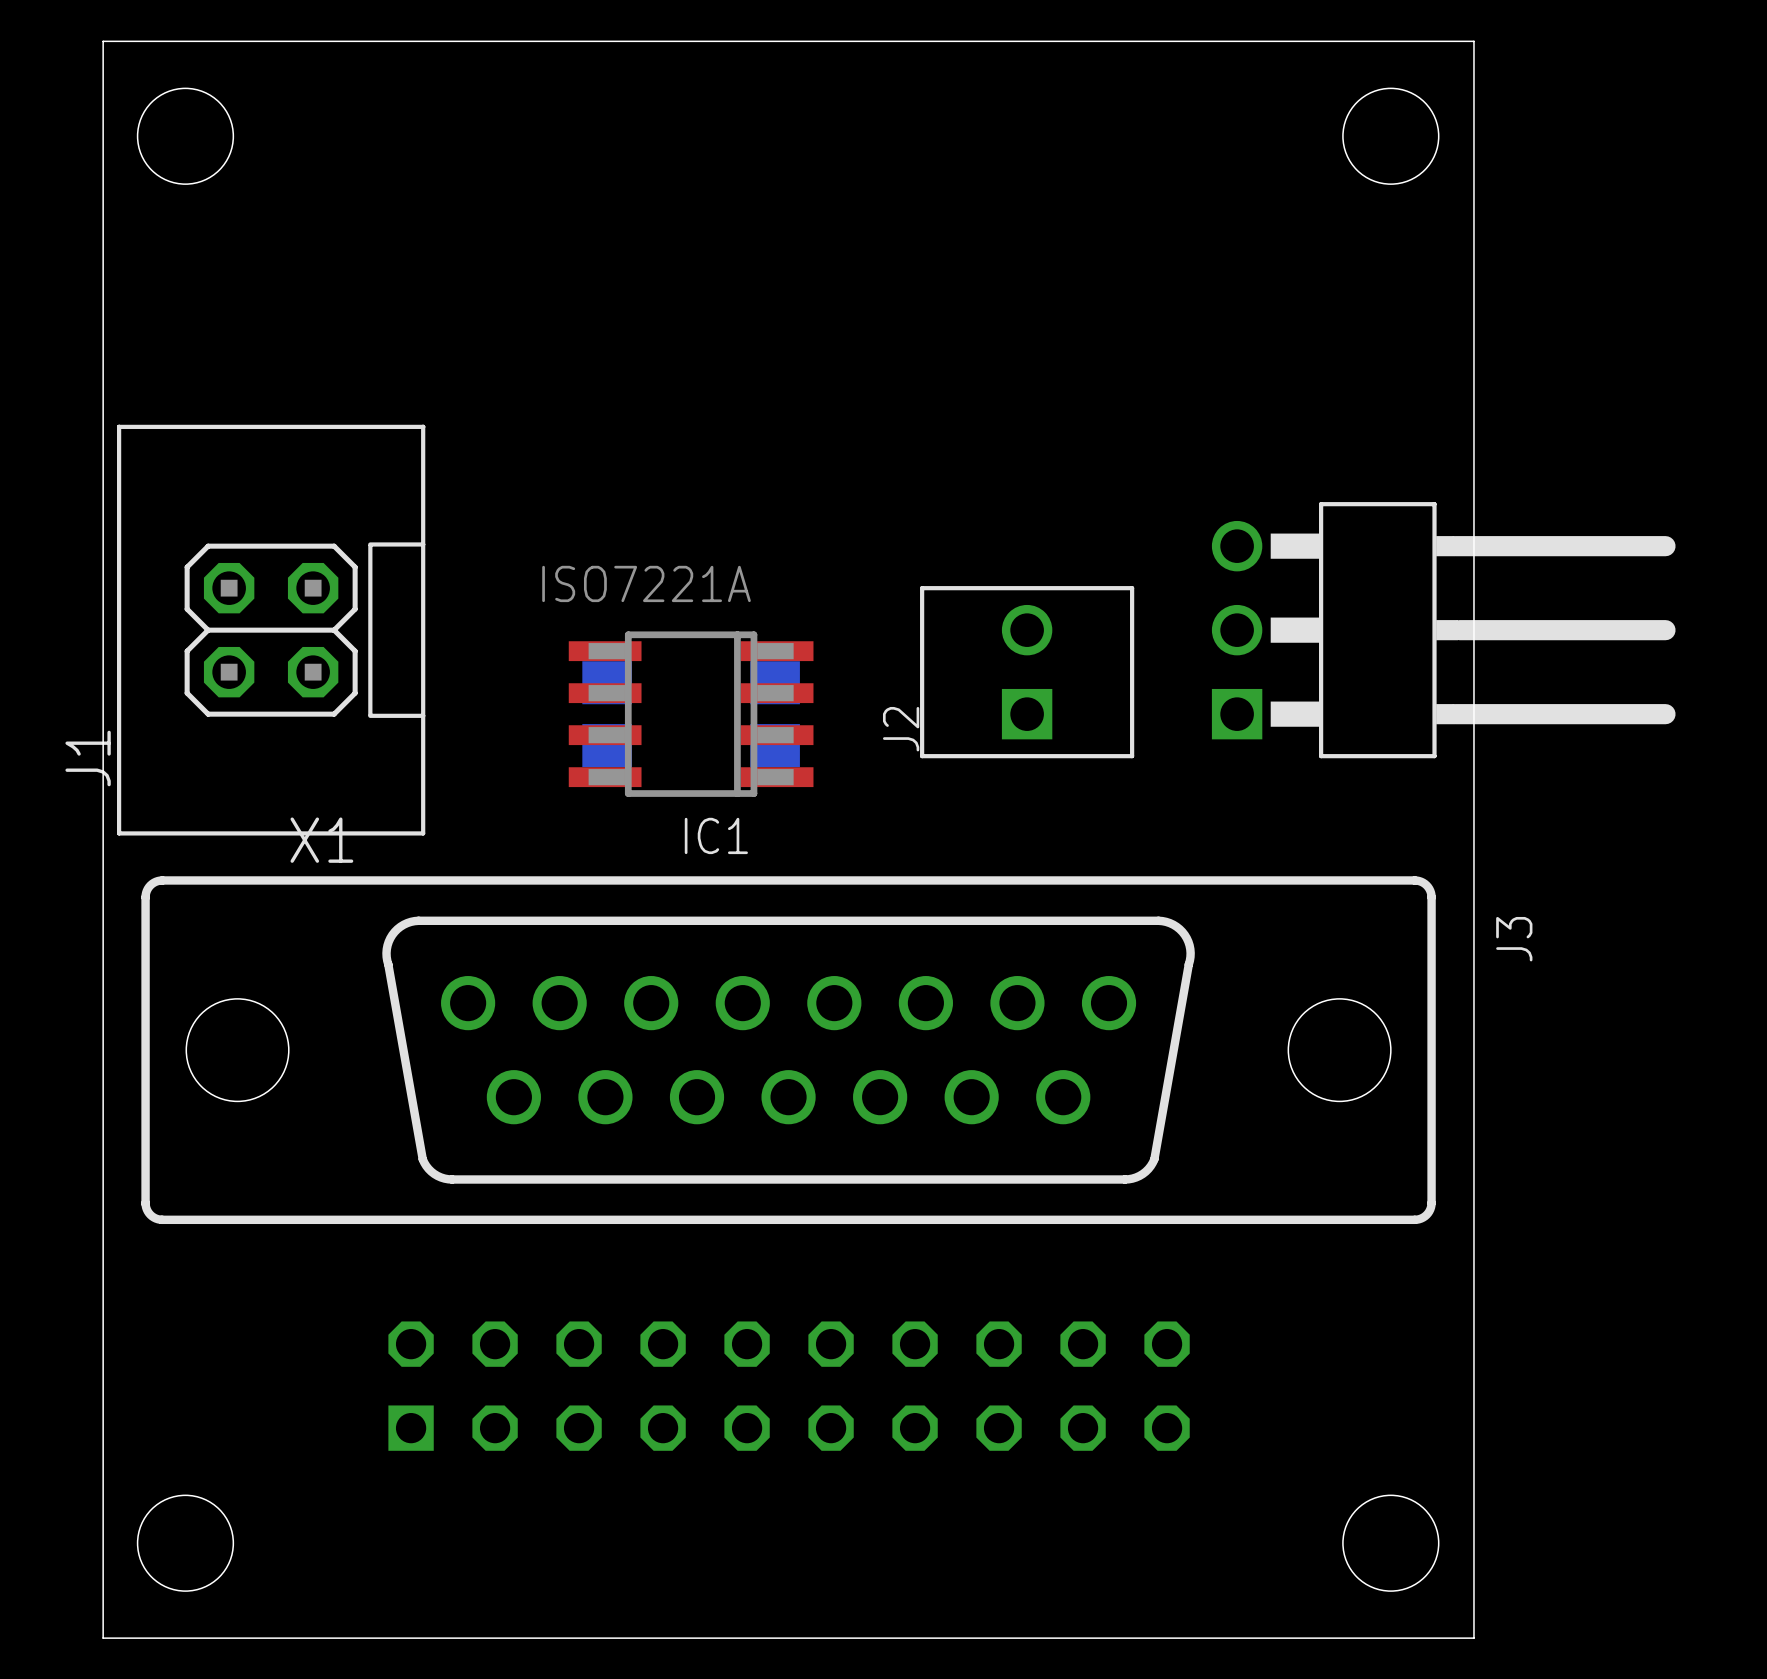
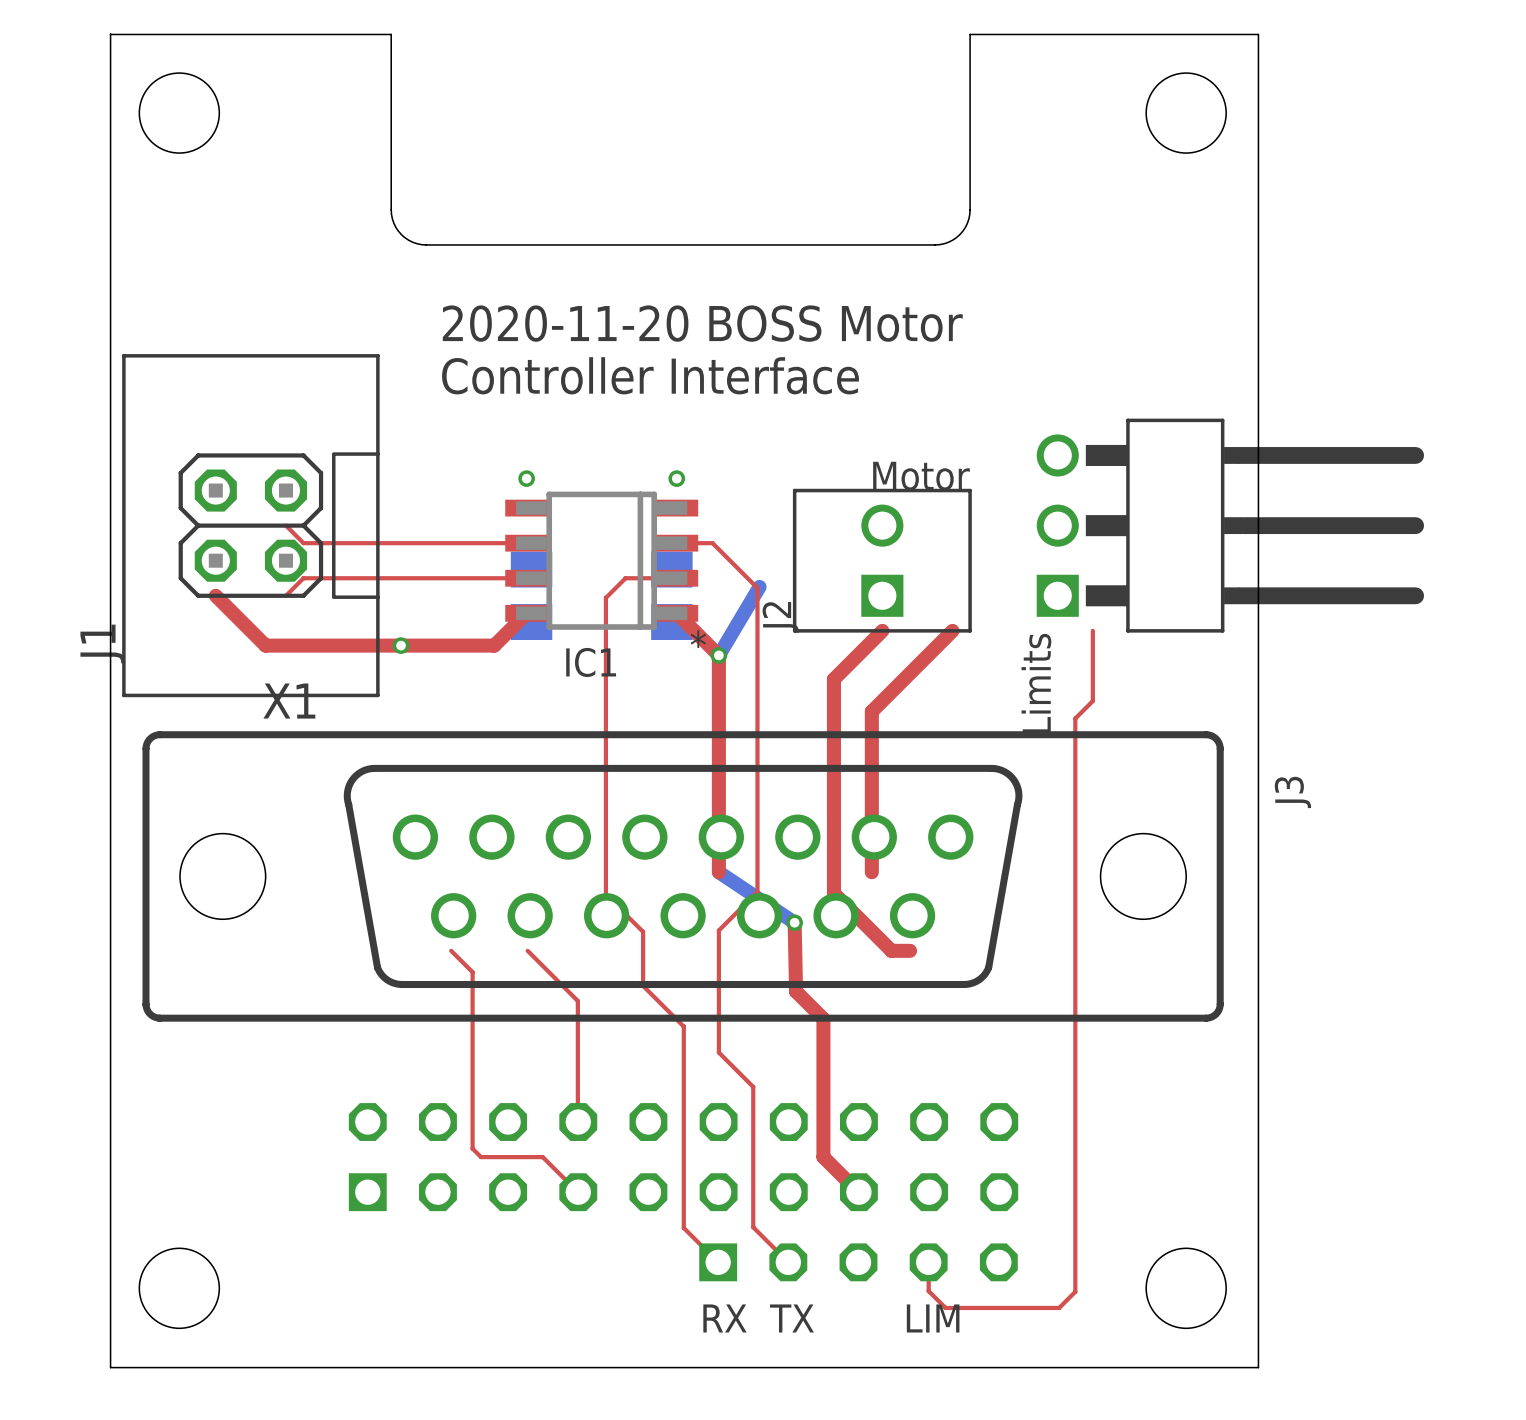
board edge: (103, 41) (1473, 41) (1473, 1638) -> (110, 34) (391, 34) (391, 214) (395, 227) (404, 237) (417, 243) (426, 244) (944, 243) (952, 240) (962, 231) (969, 214) (970, 34) (1258, 34) (1258, 1367) (1255, 1367)
text: none -> 2020-11-20 BOSS Motor (702, 323)
text: none -> Controller Interface (650, 375)
text: none -> Motor (921, 476)
via: none -> (526, 478)
via: none -> (676, 478)
IC1 value: ISO7221A (646, 583) -> none
top track: none -> (285, 525) (303, 543) (526, 543)
IC1 footprint: [568, 631, 814, 797] -> [505, 491, 699, 630]
top track: none -> (676, 543) (712, 543) (757, 588) (757, 891) (718, 930) (718, 1052) (753, 1086) (753, 1227) (788, 1262)
top track: none -> (526, 578) (303, 578) (285, 595)
top track: none -> (676, 578) (625, 578) (605, 597) (605, 894) (643, 931) (643, 985) (683, 1026) (683, 1227) (718, 1262)
bottom track: none -> (759, 586) (718, 655)
top track: none -> (215, 595) (265, 645) (494, 645) (526, 613)
top track: none -> (676, 613) (718, 655) (718, 872)
top track: none -> (882, 630) (833, 679) (833, 893) (891, 950) (910, 950)
top track: none -> (952, 630) (871, 711) (871, 872)
top track: none -> (1092, 630) (1092, 701) (1075, 718) (1075, 1291) (1059, 1307) (945, 1307) (928, 1291) (928, 1262)
via: none -> (401, 645)
via: none -> (718, 655)
text: none -> Limits (1036, 683)
bottom track: none -> (718, 872) (794, 922)
top track: none -> (794, 922) (796, 991) (823, 1018) (823, 1157) (858, 1192)
via: none -> (794, 922)
top track: none -> (451, 950) (472, 972) (472, 1148) (481, 1157) (542, 1157) (577, 1192)
top track: none -> (527, 950) (577, 1000) (577, 1122)
part: none -> (858, 1262)
text: none -> RX (725, 1318)
text: none -> TX (791, 1318)
text: none -> LIM (933, 1318)

